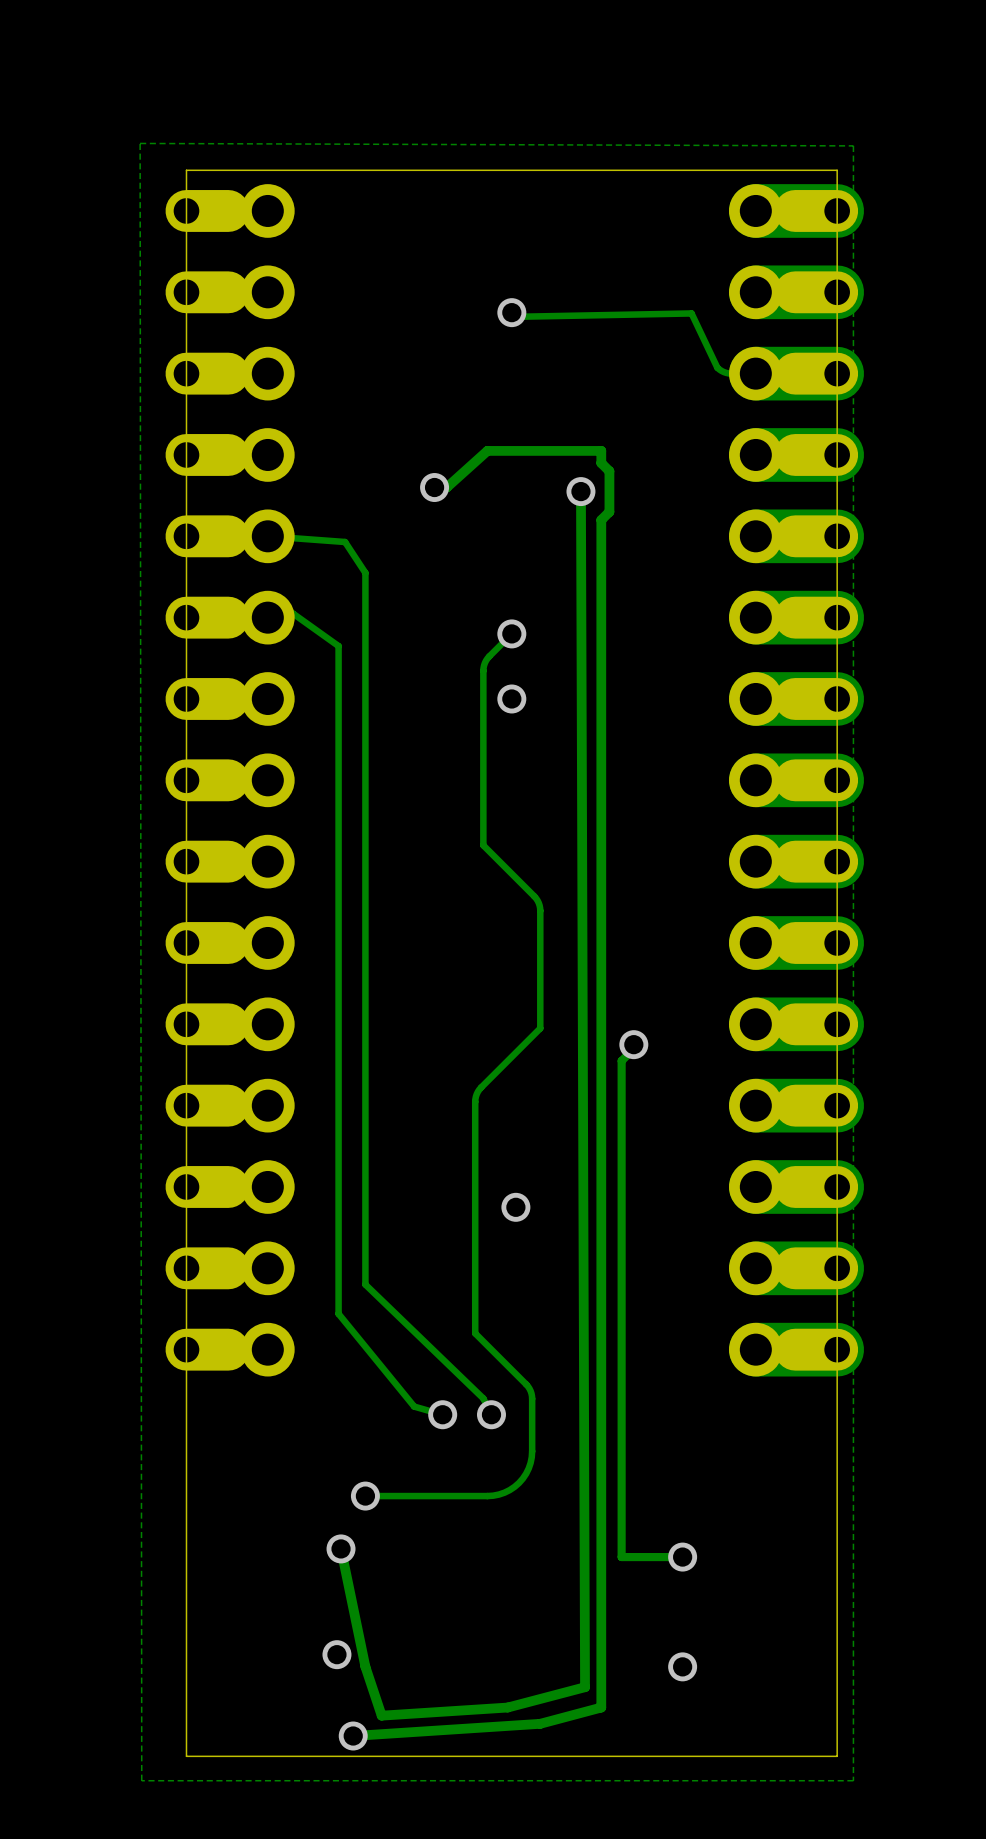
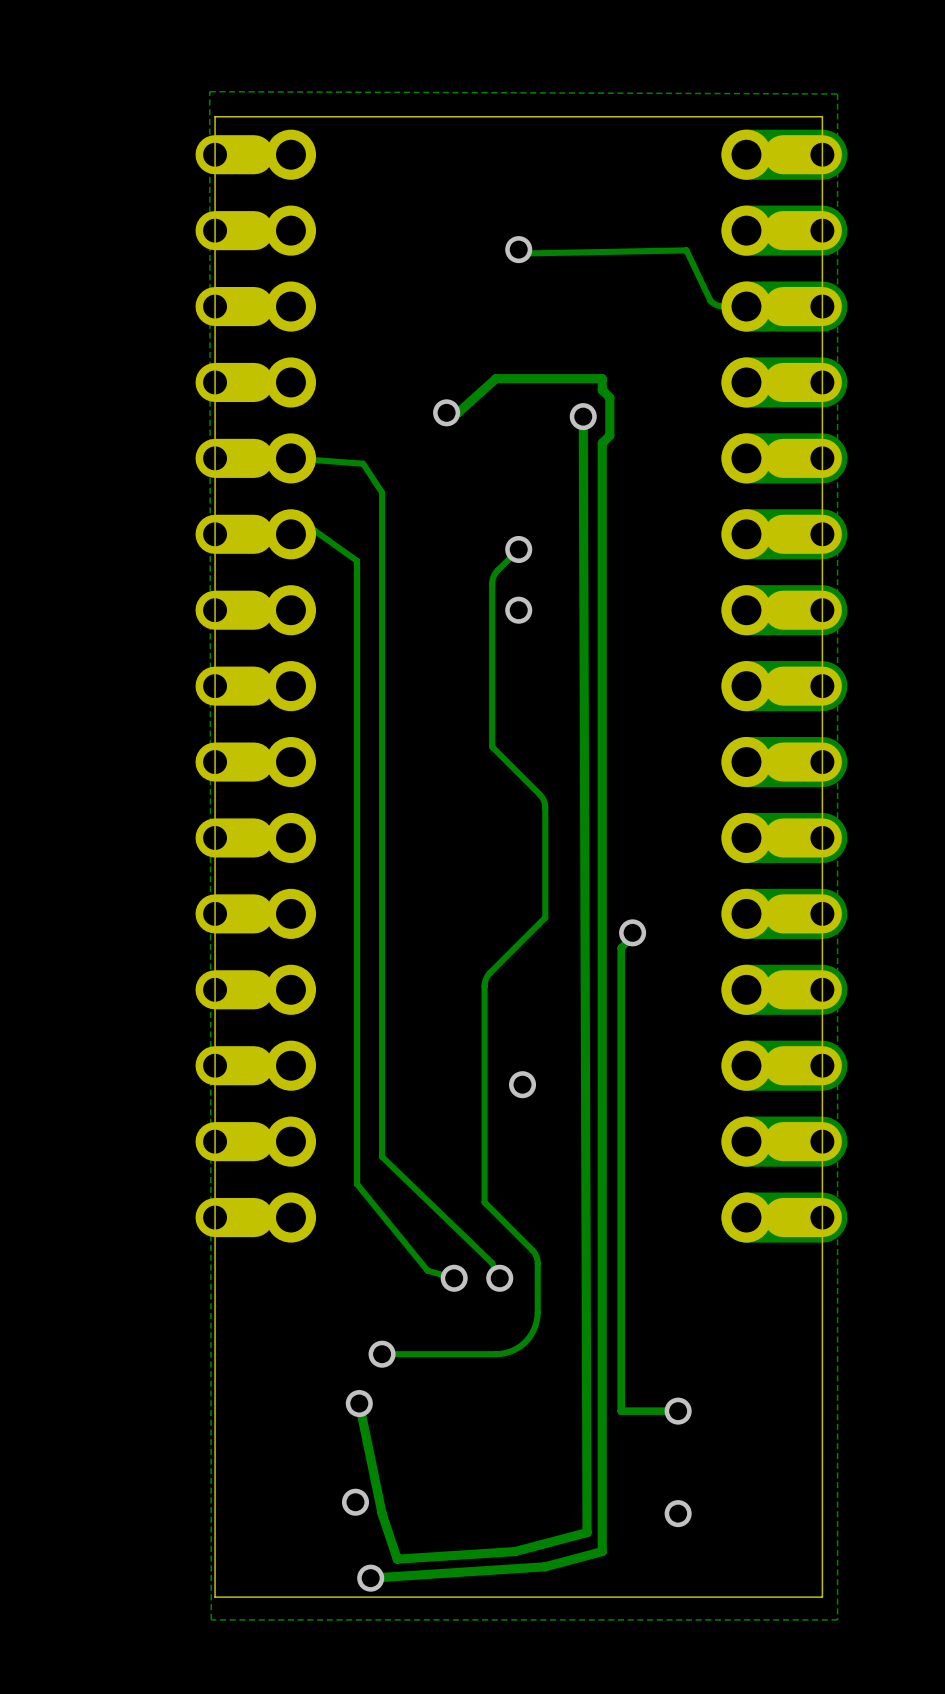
zone outline: (853, 145) (140, 143) (141, 1780) (182, 1780) -> (837, 93) (209, 91) (211, 1619)

